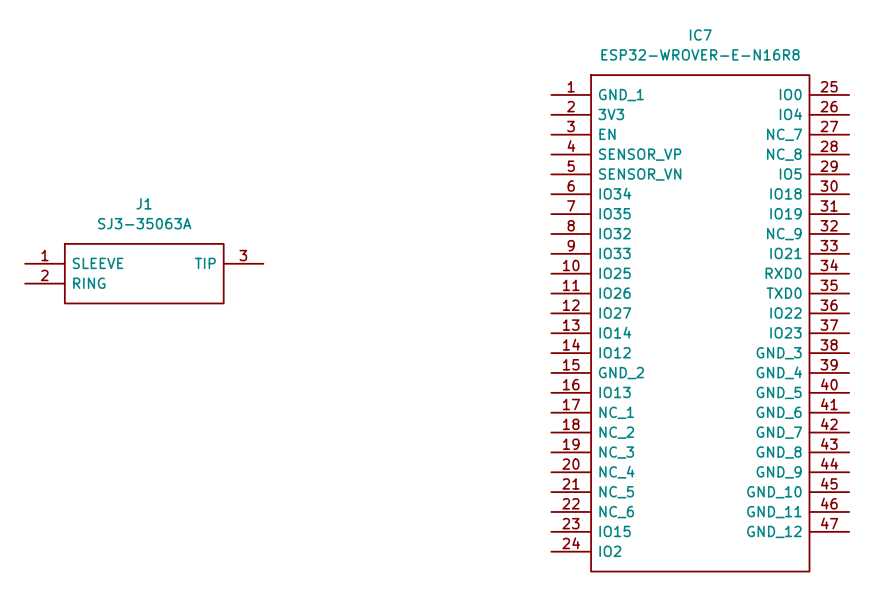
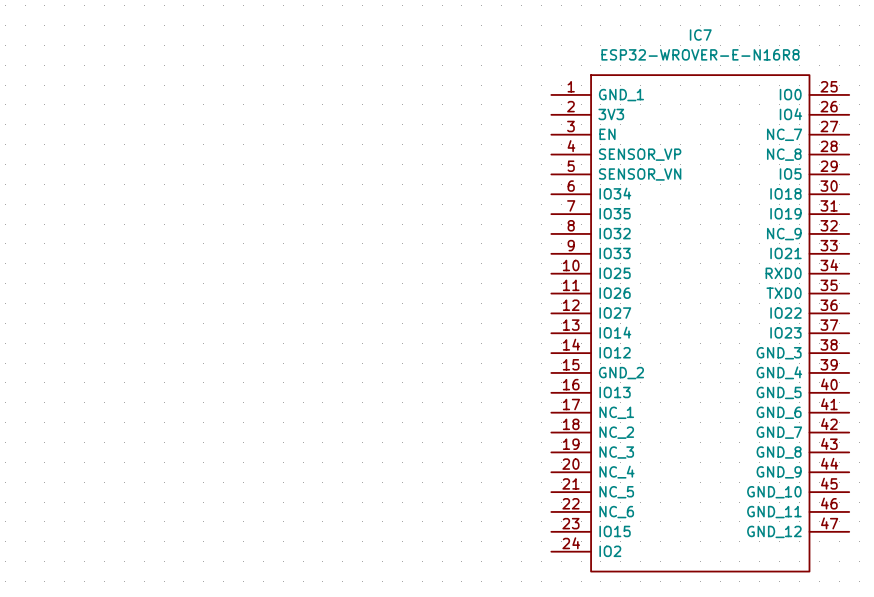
J1: SJ3-35063A (144, 273) -> none

